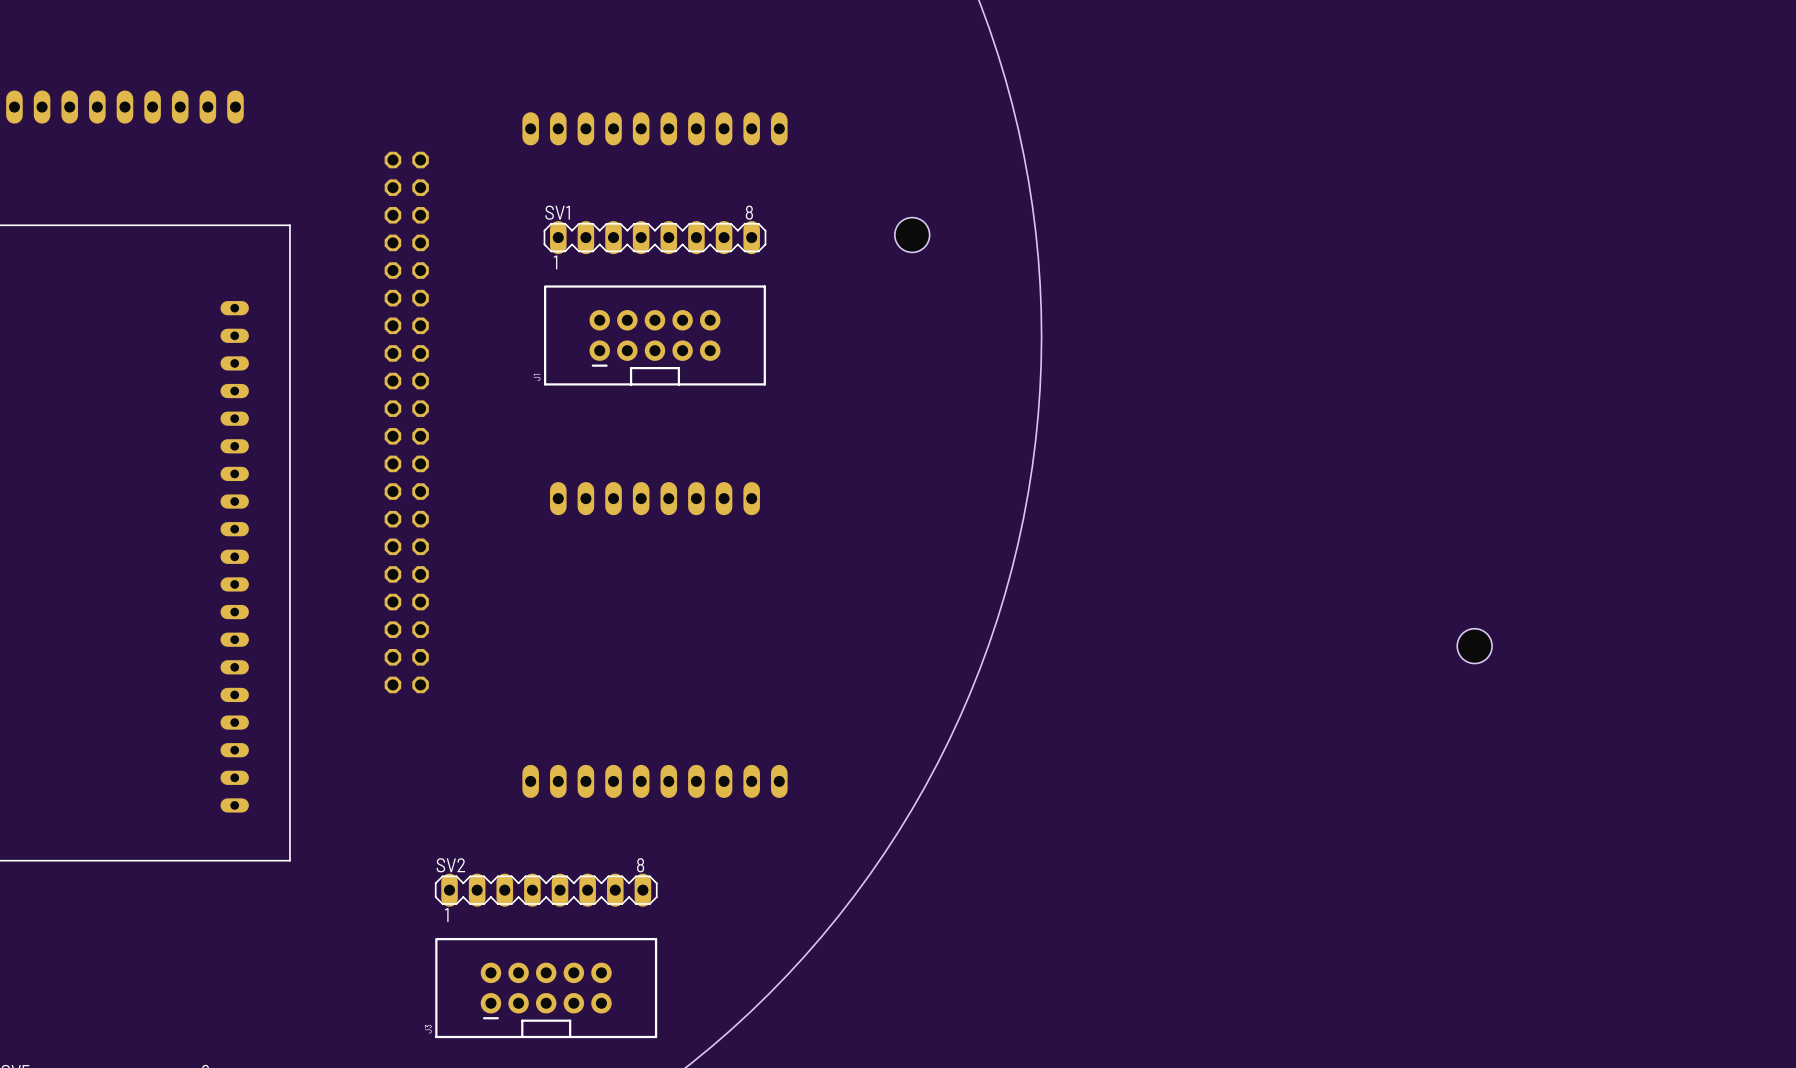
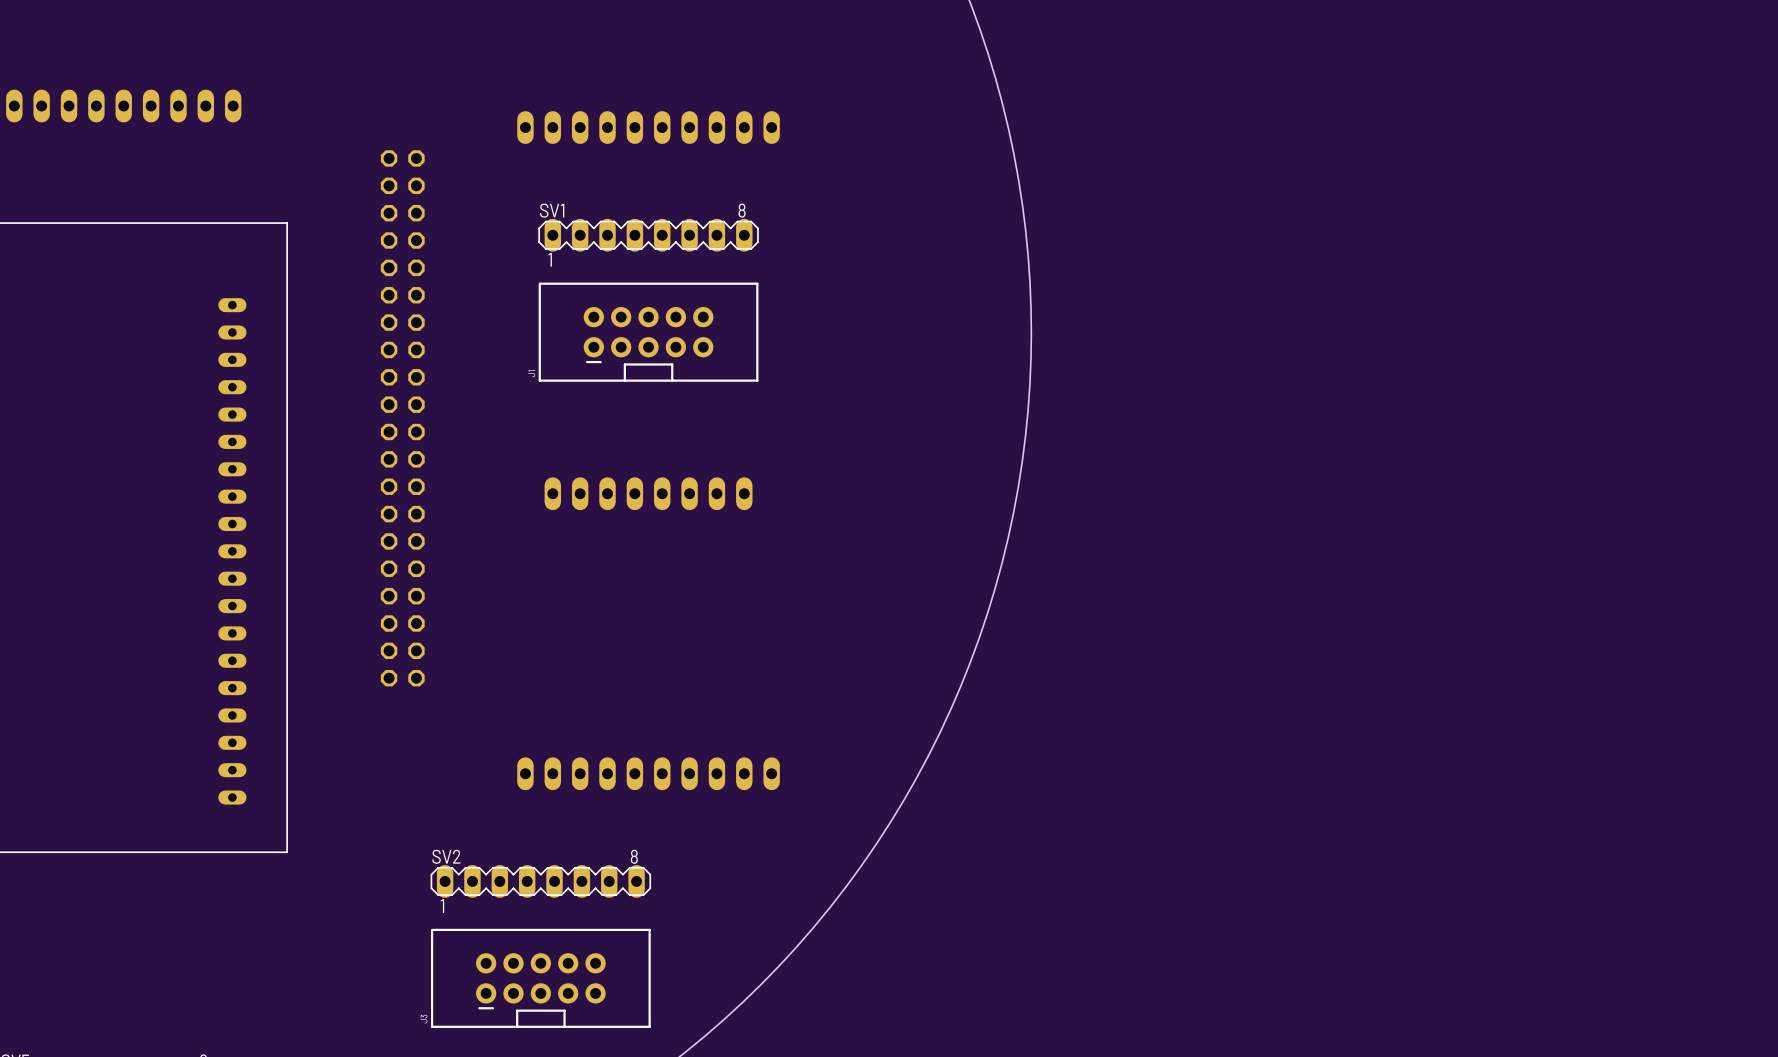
hole: (912, 235) -> none
hole: (1474, 646) -> none

